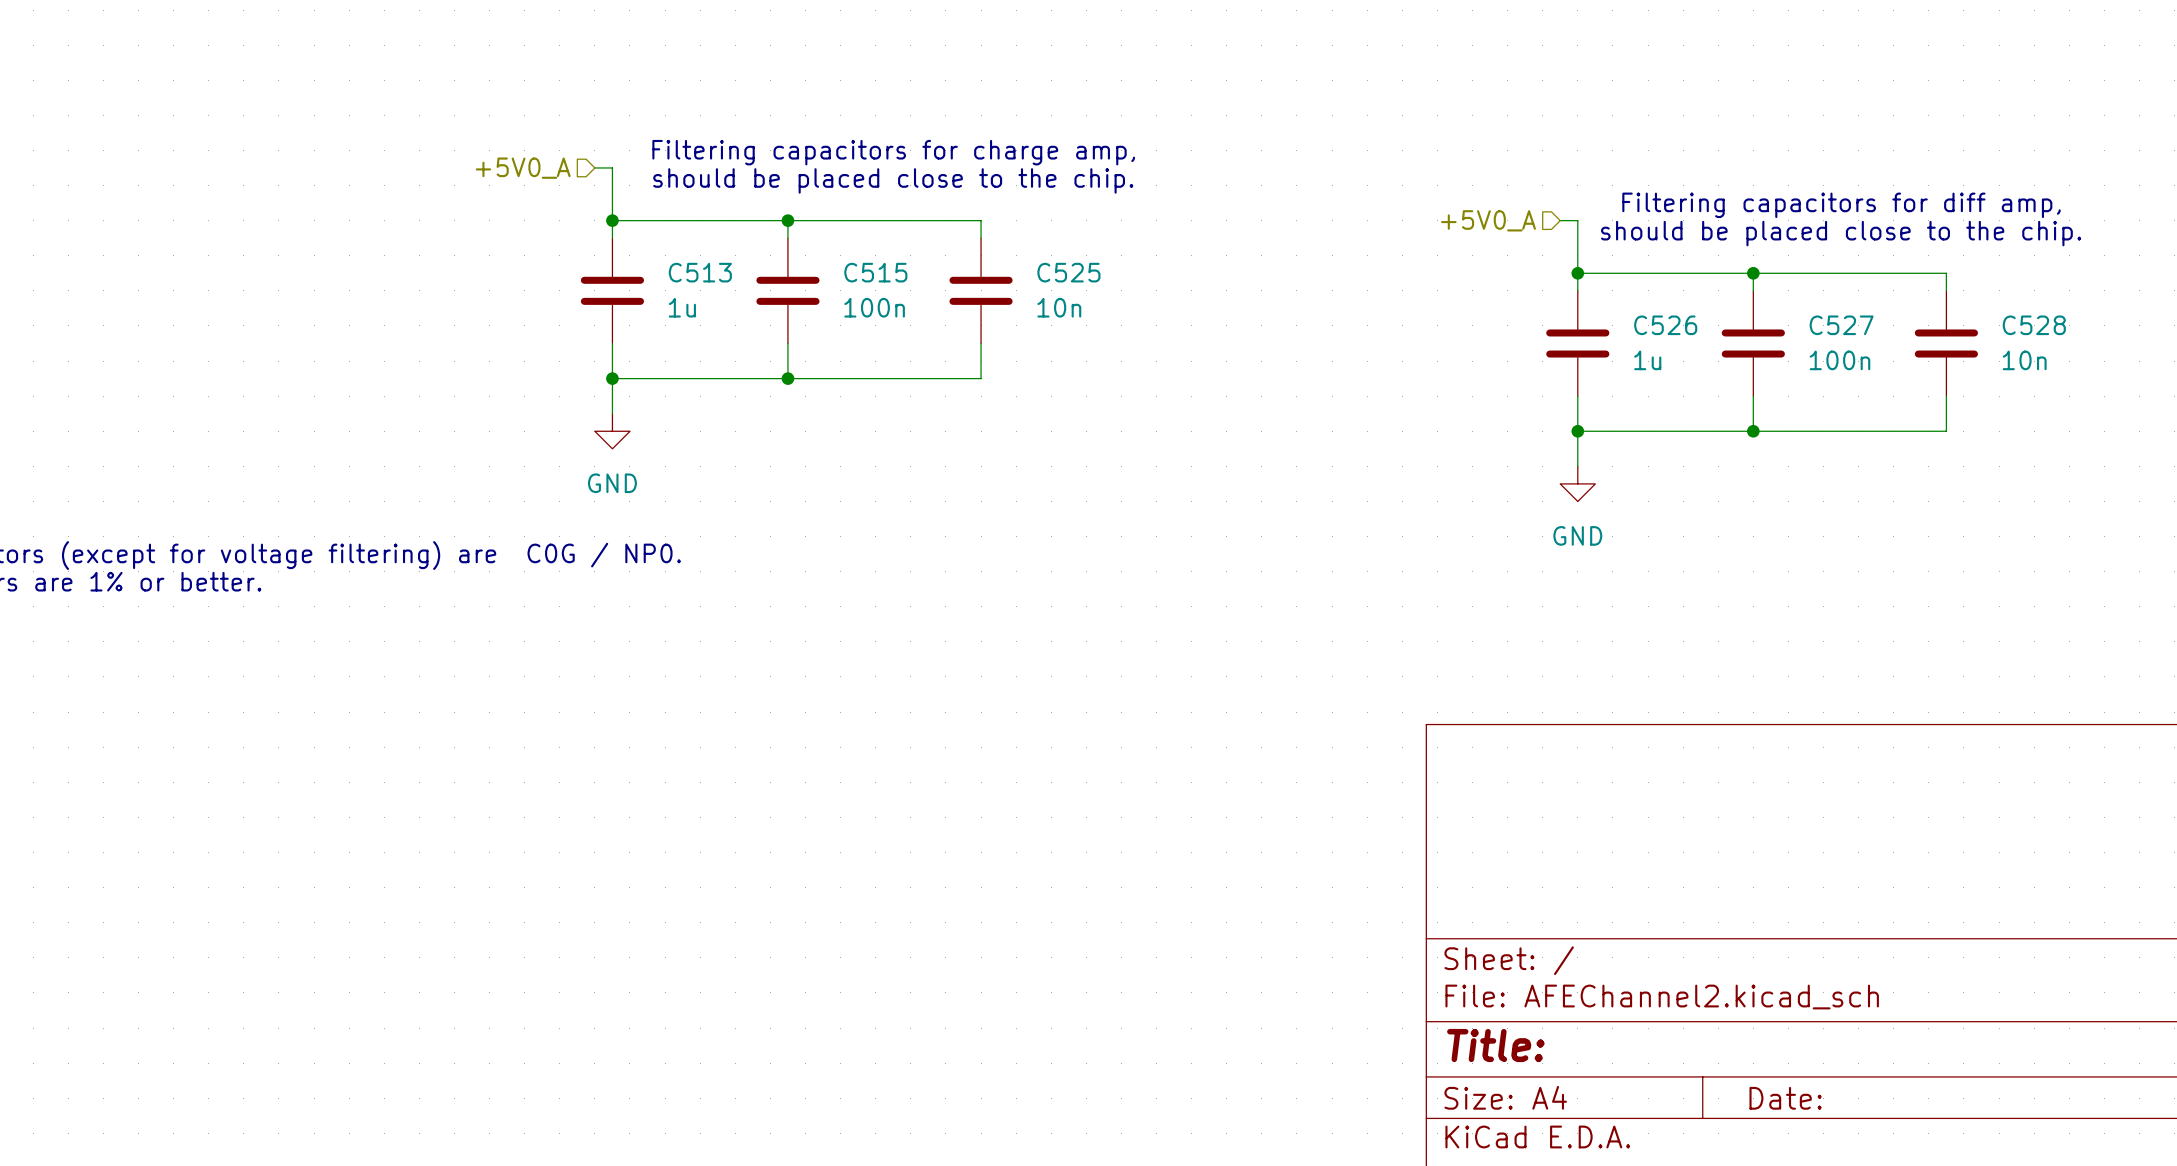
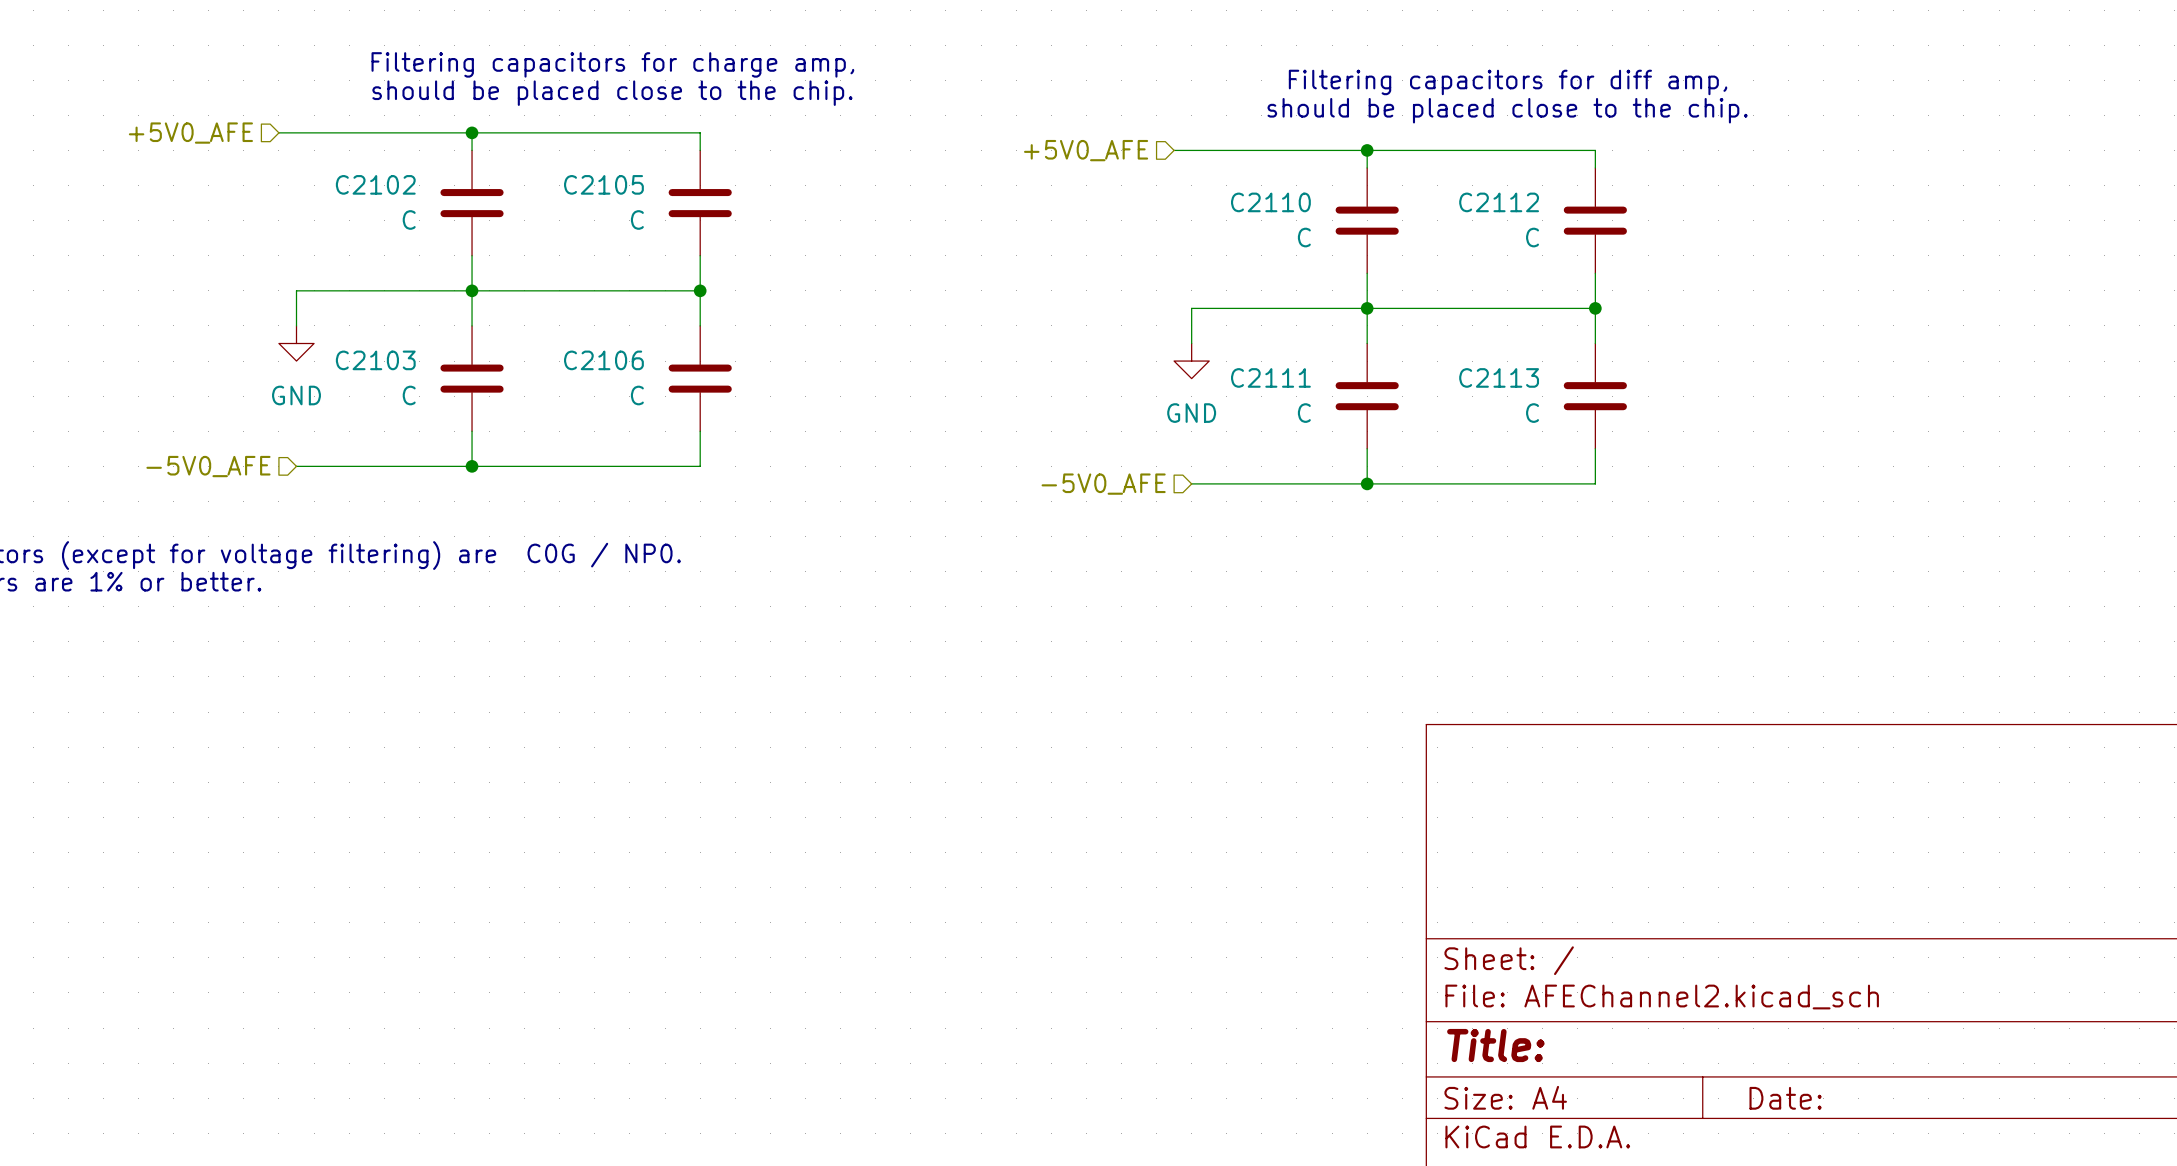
text: none -> Filtering capacitors for diff amp, (1508, 82)
text: none -> should be placed close to the chip. (1507, 110)
wire: none -> (278, 132) (700, 132) (700, 150)
junction: none -> (472, 132)
hierarchical label: none -> +5V0_AFE (190, 133)
hierarchical label: none -> +5V0_AFE (1086, 150)
wire: none -> (1174, 150) (1595, 150) (1595, 167)
wire: none -> (1367, 150) (1367, 167)
junction: none -> (1367, 150)
text position: Filtering capacitors for charge amp, (893, 152) -> Filtering capacitors for charge amp, (612, 64)
wire: (594, 167) (612, 167) (612, 238) -> none
hierarchical label: +5V0_A (523, 168) -> none
text position: should be placed close to the chip. (893, 180) -> should be placed close to the chip. (612, 93)
C2102: none -> C (472, 203)
C2105: none -> C (700, 203)
text: Filtering capacitors for diff amp, (1841, 205) -> none
wire: (612, 220) (981, 220) (981, 238) -> none
junction: (612, 220) -> none
wire: (787, 220) (787, 238) -> (472, 132) (472, 150)
junction: (787, 220) -> none
C2110: none -> C (1367, 220)
hierarchical label: +5V0_A (1488, 220) -> none
wire: (1560, 220) (1577, 220) (1577, 290) -> none
C2112: none -> C (1595, 220)
text: should be placed close to the chip. (1841, 233) -> none
wire: none -> (472, 255) (472, 325)
wire: none -> (1367, 273) (1367, 343)
wire: (1577, 273) (1946, 273) (1946, 290) -> none
junction position: (1577, 273) -> (1595, 308)
wire: (1753, 273) (1753, 290) -> none
junction: (1753, 273) -> none
junction: none -> (472, 290)
C513: 1u (612, 290) -> none
wire: none -> (700, 290) (296, 290) (296, 325)
junction: none -> (700, 290)
C515: 100n (787, 290) -> none
C525: 10n (981, 290) -> none
junction: none -> (1367, 308)
wire: none -> (1595, 308) (1191, 308) (1191, 343)
power symbol: none -> GND (296, 343)
wire: (612, 343) (612, 413) -> (700, 255) (700, 325)
wire: (787, 343) (787, 378) -> (472, 431) (472, 466)
wire: (981, 343) (981, 378) (612, 378) -> none
C526: 1u (1577, 343) -> none
C527: 100n (1753, 343) -> none
C528: 10n (1946, 343) -> none
power symbol: none -> GND (1191, 361)
C2103: none -> C (472, 378)
junction: (612, 378) -> none
C2106: none -> C (700, 378)
junction: (787, 378) -> none
C2111: none -> C (1367, 396)
wire: (1577, 396) (1577, 466) -> (1595, 273) (1595, 343)
C2113: none -> C (1595, 396)
wire: (1753, 396) (1753, 431) -> none
wire: (1946, 396) (1946, 431) (1577, 431) -> none
power symbol: GND (612, 431) -> none
wire: none -> (700, 431) (700, 466) (296, 466)
junction: (1577, 431) -> none
junction: (1753, 431) -> none
wire: none -> (1367, 448) (1367, 483)
wire: none -> (1595, 448) (1595, 483) (1191, 483)
hierarchical label: none -> -5V0_AFE (208, 466)
junction: none -> (472, 466)
junction: none -> (1367, 483)
power symbol: GND (1577, 483) -> none
hierarchical label: none -> -5V0_AFE (1103, 484)

